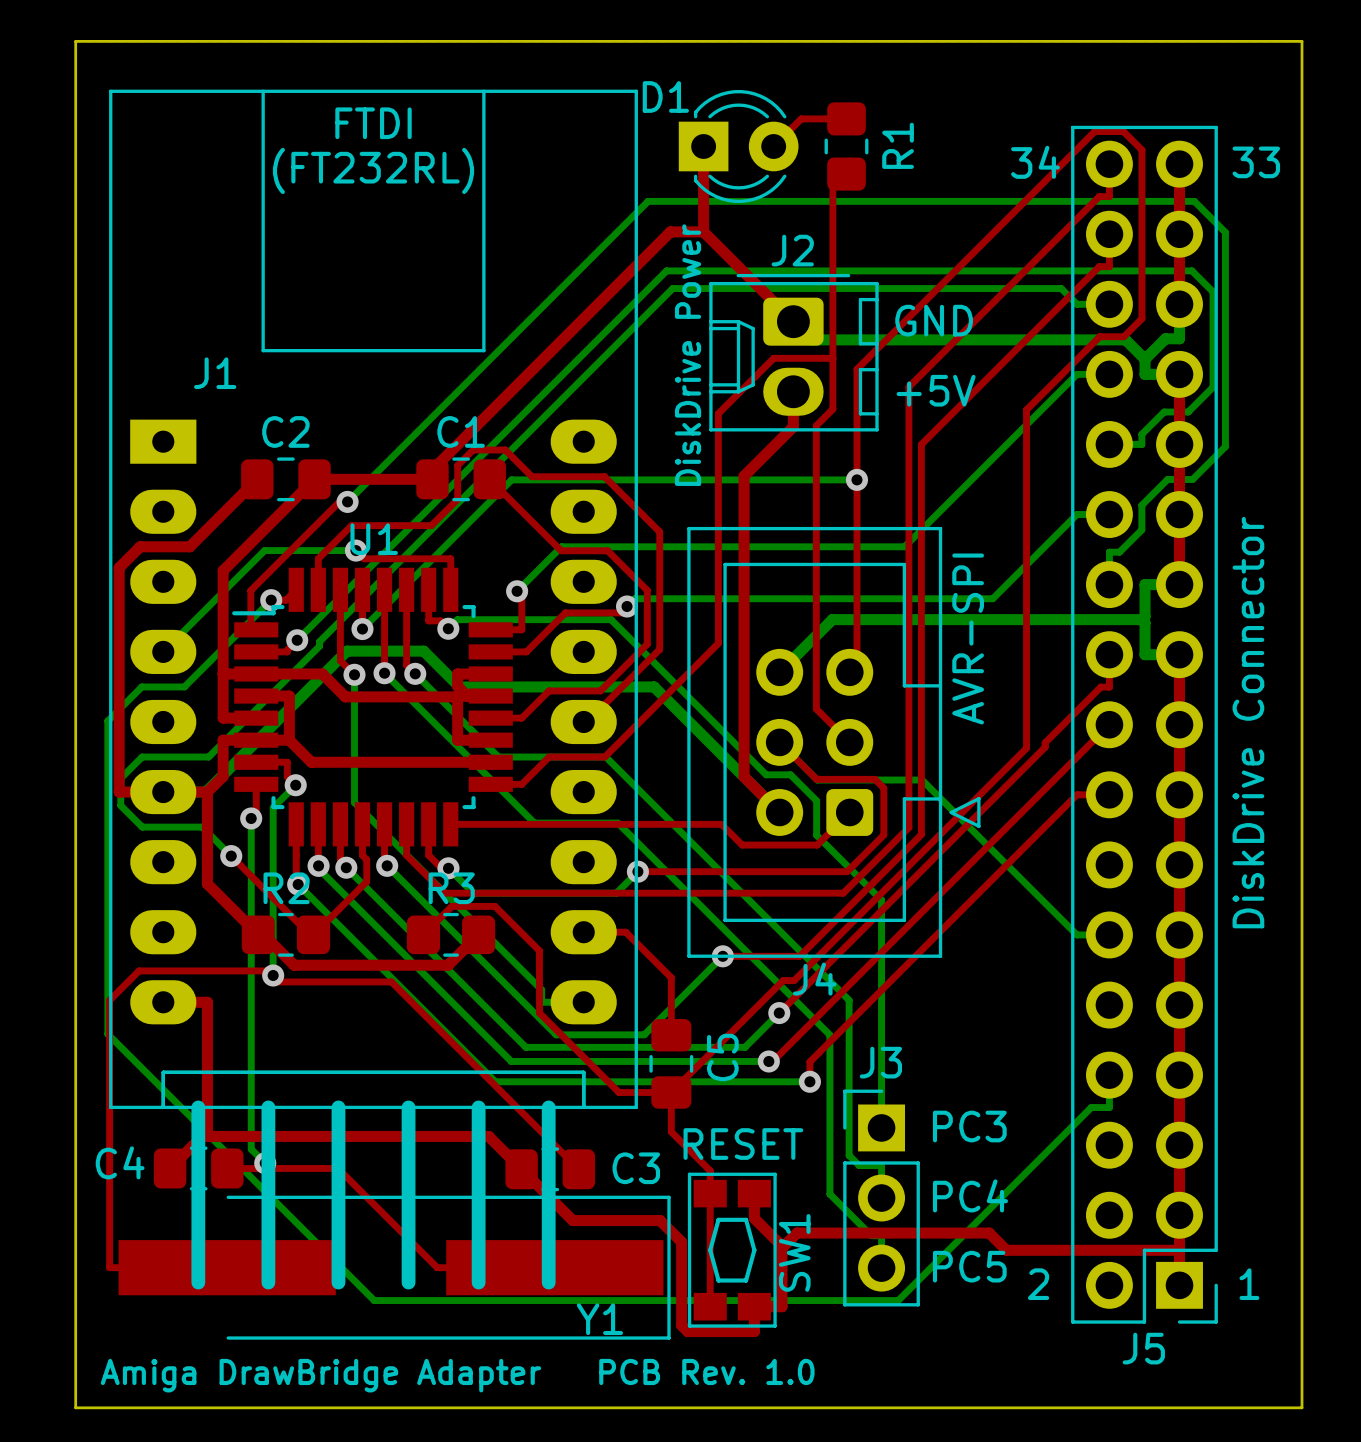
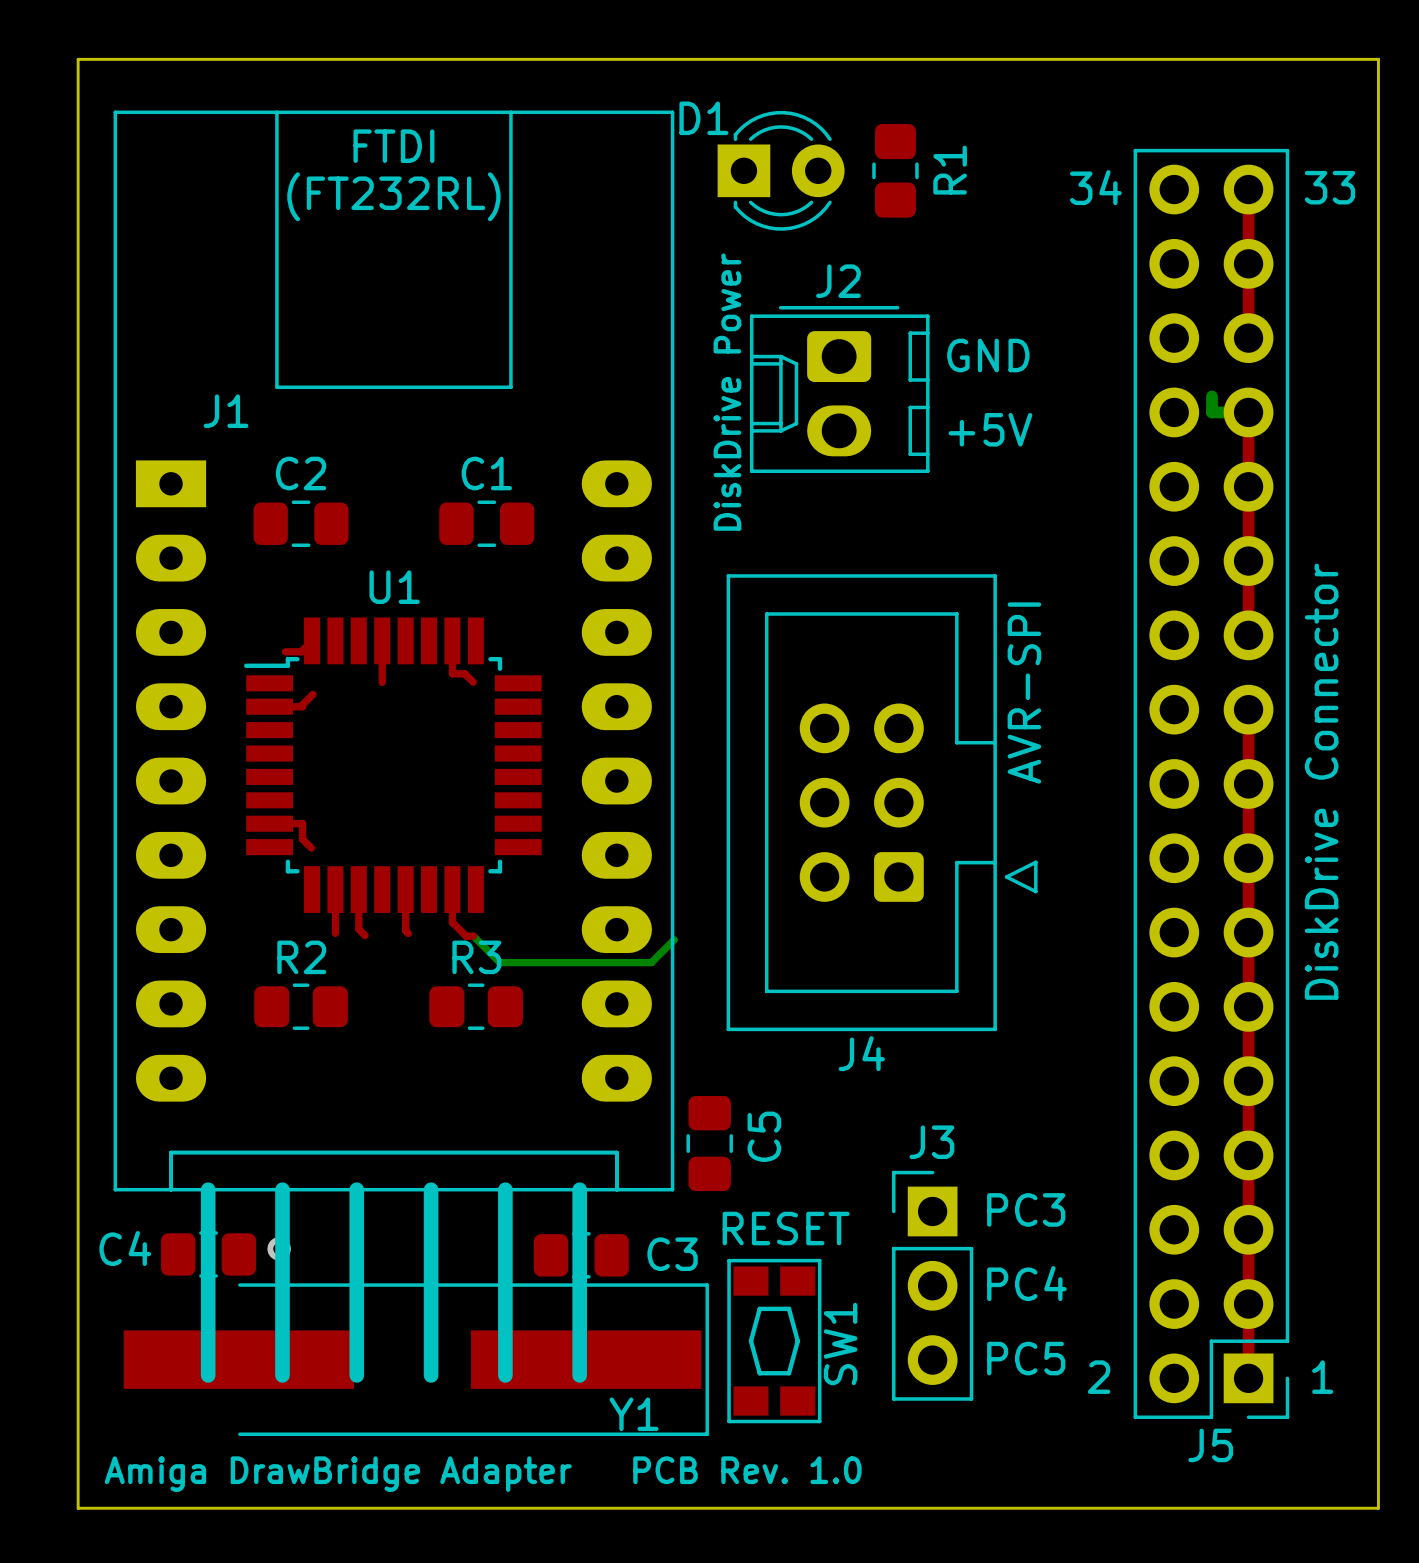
top track: (846, 118) (801, 118) (773, 146) -> none
top track: (703, 146) (703, 231) -> none
top track: (1109, 164) (1109, 196) (1099, 196) (908, 386) (908, 827) (843, 893) (444, 893) (406, 855) (406, 824) -> none
top track: (846, 174) (832, 187) (832, 409) (816, 425) (816, 708) (849, 742) -> none
top track: (703, 231) (670, 231) (432, 469) (432, 479) (314, 479) (223, 570) (223, 718) (256, 718) -> none
top track: (703, 231) (793, 321) -> none
top track: (1109, 234) (1109, 266) (1099, 266) (921, 444) (921, 834) (799, 956) (722, 956) -> none
bottom track: (1109, 304) (1077, 304) (1061, 288) (672, 288) (319, 641) (319, 646) (208, 757) (142, 757) (120, 778) (120, 805) (142, 827) (202, 827) (231, 856) -> none
bottom track: (1179, 304) (1179, 338) (1165, 338) (1145, 359) (1125, 339) (811, 339) (793, 321) -> none
top track: (832, 358) (773, 358) (718, 413) (718, 643) (604, 757) (549, 757) (521, 784) (490, 784) -> none
bottom track: (1109, 374) (1077, 374) (904, 546) (561, 546) (517, 591) -> none
top track: (793, 391) (793, 426) (744, 476) (744, 776) (779, 812) -> none
bottom track: (1109, 444) (1141, 444) (1141, 434) (1164, 412) (1188, 412) (1213, 387) (1213, 291) (1192, 270) (666, 270) (297, 640) -> none
top track: (257, 479) (189, 546) (140, 546) (119, 567) (119, 792) (207, 792) -> none
top track: (489, 479) (561, 550) (607, 550) (647, 590) (647, 644) (600, 690) (549, 690) (521, 718) (490, 718) -> none
bottom track: (856, 479) (511, 479) (362, 629) -> none
via: (856, 479) -> none
top track: (347, 501) (339, 501) (250, 590) (250, 624) (256, 629) -> none
bottom track: (347, 501) (648, 201) (1194, 201) (1225, 232) (1225, 446) (1192, 479) (1167, 479) (1141, 505) (1141, 529) (1119, 552) (1109, 552) (1109, 584) -> none
via: (347, 501) -> none
bottom track: (1109, 514) (1077, 514) (992, 598) (634, 598) (627, 606) -> none
top track: (355, 550) (364, 558) (450, 558) (450, 589) -> none
bottom track: (355, 550) (264, 550) (163, 651) -> none
via: (355, 550) -> none
bottom track: (1179, 584) (1145, 584) (1145, 616) (1141, 619) -> none
top track: (318, 589) (318, 558) (351, 525) (431, 525) (457, 499) (457, 465) (473, 450) (505, 450) (532, 476) (604, 476) (659, 531) (659, 649) (587, 721) (583, 721) -> none
top track: (340, 589) (340, 660) (354, 674) -> none
top track: (384, 589) (384, 673) -> none
top track: (406, 589) (406, 665) (415, 673) -> none
top track: (517, 591) (521, 595) (521, 629) (490, 629) -> none
via: (517, 591) -> none
bottom track: (271, 600) (184, 686) (141, 686) (107, 720) (107, 1034) (374, 1300) (898, 1300) (1091, 1107) (1109, 1107) (1109, 1075) -> none
via: (271, 600) -> none
top track: (627, 606) (620, 612) (565, 612) (526, 651) (490, 651) -> none
via: (627, 606) -> none
bottom track: (1141, 619) (832, 619) (779, 672) -> none
bottom track: (1141, 619) (1145, 622) (1145, 654) (1179, 654) -> none
bottom track: (448, 628) (457, 619) (611, 619) (766, 774) (790, 774) (816, 800) (816, 835) (881, 900) (881, 1127) -> none
via: (448, 628) -> none
via: (362, 629) -> none
via: (297, 640) -> none
top track: (1109, 654) (1109, 687) (1100, 687) (1045, 742) (1045, 747) (779, 1013) -> none
top track: (849, 672) (856, 665) (856, 369) (1094, 131) (1123, 131) (1141, 150) (1141, 318) (1123, 336) (1099, 336) (1026, 409) (1026, 748) (794, 980) (783, 980) (671, 1092) -> none
top track: (223, 673) (322, 673) (345, 696) (457, 696) -> none
bottom track: (384, 673) (534, 823) (618, 823) (829, 1035) (829, 1194) (871, 1235) (881, 1235) (881, 1268) -> none
via: (384, 673) -> none
bottom track: (415, 673) (498, 757) (605, 757) (849, 1000) (849, 1155) (859, 1165) (881, 1165) (881, 1198) -> none
via: (415, 673) -> none
top track: (490, 673) (457, 673) (457, 686) (467, 696) -> none
bottom track: (354, 674) (354, 802) (541, 989) (541, 1002) (583, 1002) -> none
via: (354, 674) -> none
top track: (256, 696) (289, 696) (289, 740) -> none
top track: (457, 696) (457, 740) (490, 740) -> none
top track: (1109, 724) (772, 1061) (768, 1061) -> none
top track: (289, 740) (223, 740) (223, 776) (207, 792) -> none
top track: (289, 740) (311, 762) (490, 762) -> none
top track: (779, 742) (816, 779) (875, 779) (883, 788) (883, 835) (847, 871) (637, 871) -> none
bottom track: (779, 742) (817, 780) (922, 780) (1077, 934) (1109, 934) -> none
top track: (256, 784) (256, 813) (251, 818) -> none
bottom track: (295, 785) (273, 807) (273, 975) -> none
via: (295, 785) -> none
bottom track: (163, 792) (207, 792) (346, 651) (423, 651) (459, 686) (654, 686) (779, 812) -> none
top track: (207, 792) (207, 883) (258, 934) (263, 934) (294, 965) (448, 965) (478, 934) -> none
top track: (1109, 794) (1077, 794) (809, 1061) (809, 1081) -> none
top track: (849, 812) (817, 845) (742, 845) (721, 824) (450, 824) -> none
bottom track: (251, 818) (251, 1149) (265, 1163) -> none
via: (251, 818) -> none
top track: (296, 824) (296, 882) (298, 884) -> none
top track: (362, 824) (362, 855) (366, 859) (366, 881) (313, 934) (310, 934) (231, 856) -> none
via: (231, 856) -> none
bottom track: (318, 865) (318, 868) (511, 1061) (768, 1061) -> none
via: (318, 865) -> none
bottom track: (387, 865) (556, 1034) (644, 1034) (722, 956) -> none
via: (387, 865) -> none
bottom track: (346, 867) (525, 1047) (745, 1047) (779, 1013) -> none
via: (346, 867) -> none
via: (448, 868) -> none
via: (637, 871) -> none
bottom track: (298, 884) (495, 1081) (809, 1081) -> none
via: (298, 884) -> none
top track: (583, 932) (625, 932) (671, 977) (671, 1035) -> none
top track: (423, 934) (451, 906) (495, 906) (539, 950) (539, 1012) (618, 1092) (671, 1092) -> none
via: (722, 956) -> none
via: (273, 975) -> none
top track: (163, 1002) (207, 1002) (207, 1136) -> none
via: (779, 1013) -> none
via: (768, 1061) -> none
via: (809, 1081) -> none
top track: (671, 1092) (671, 1131) (710, 1170) (710, 1306) -> none
top track: (170, 1168) (202, 1136) (488, 1136) (572, 1220) (660, 1220) (681, 1242) (681, 1325) (687, 1331) (754, 1331) (754, 1306) (781, 1306) (781, 1248) (797, 1233) (989, 1233) (1006, 1250) (1179, 1250) -> none
top track: (227, 1168) (338, 1168) (437, 1267) (554, 1267) -> none
top track: (578, 1169) (391, 981) (279, 981) (268, 970) (139, 970) (109, 1000) (109, 1267) (227, 1267) -> none
top track: (754, 1193) (754, 1218) (783, 1247) -> none

